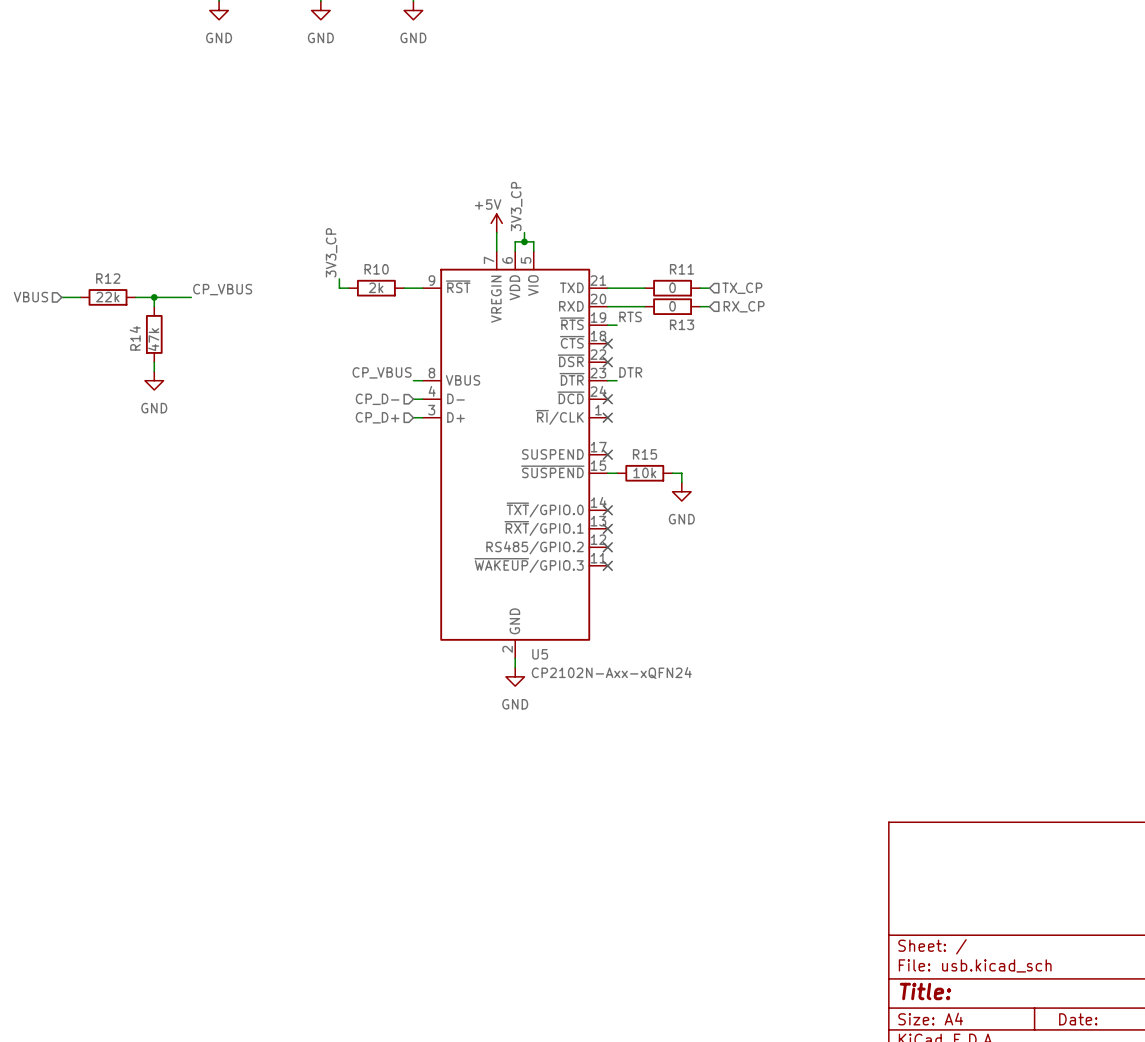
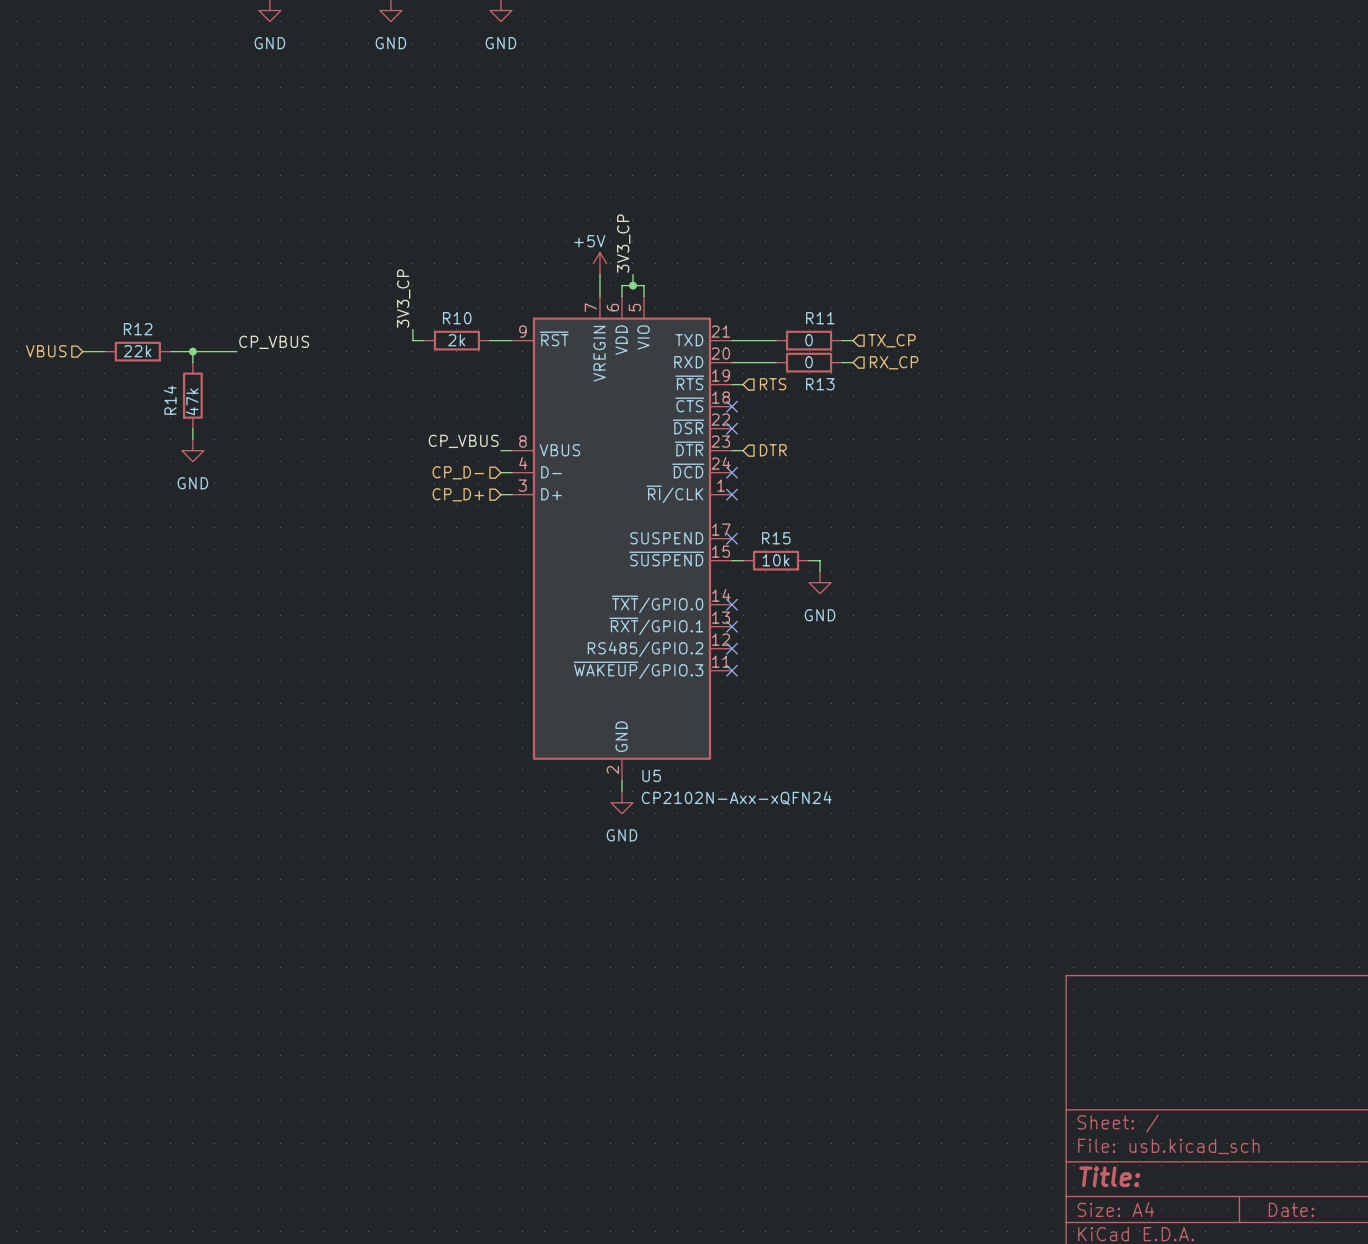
label: RTS (630, 316) -> none
hierarchical label: none -> RTS (773, 384)
label: DTR (630, 372) -> none
hierarchical label: none -> DTR (773, 450)

